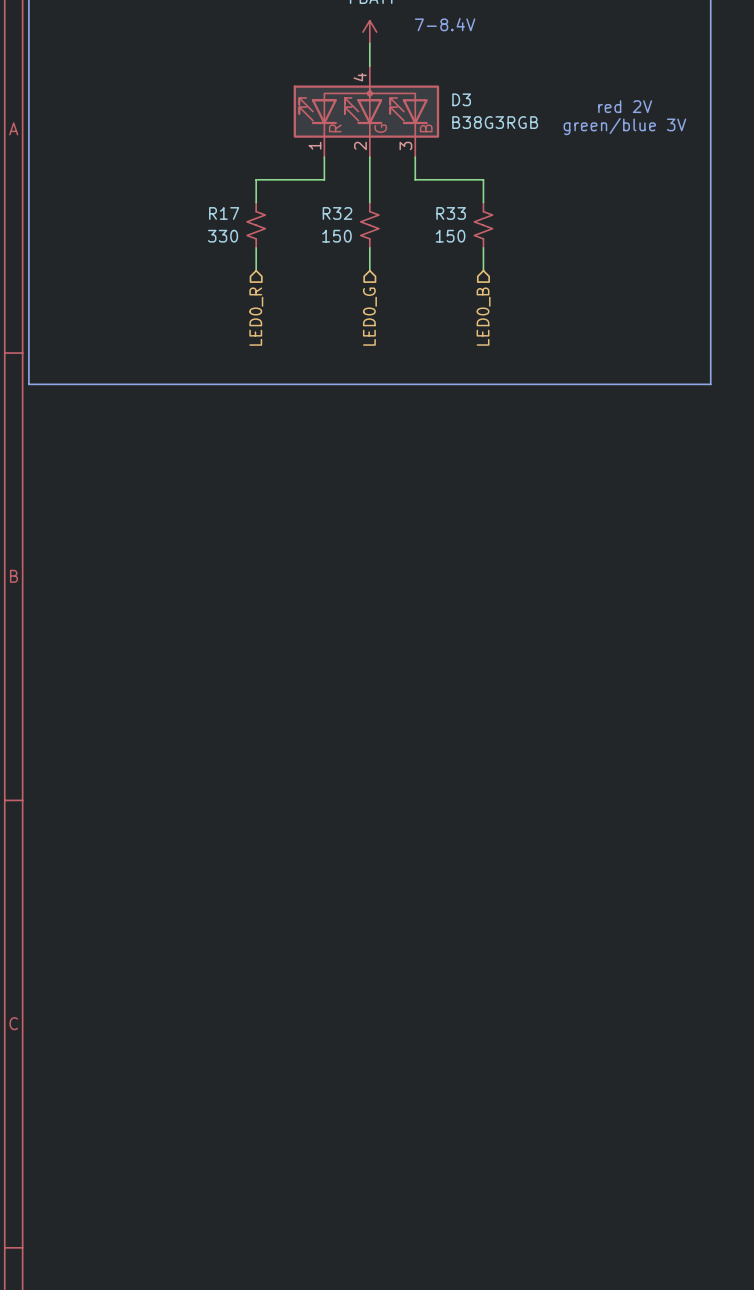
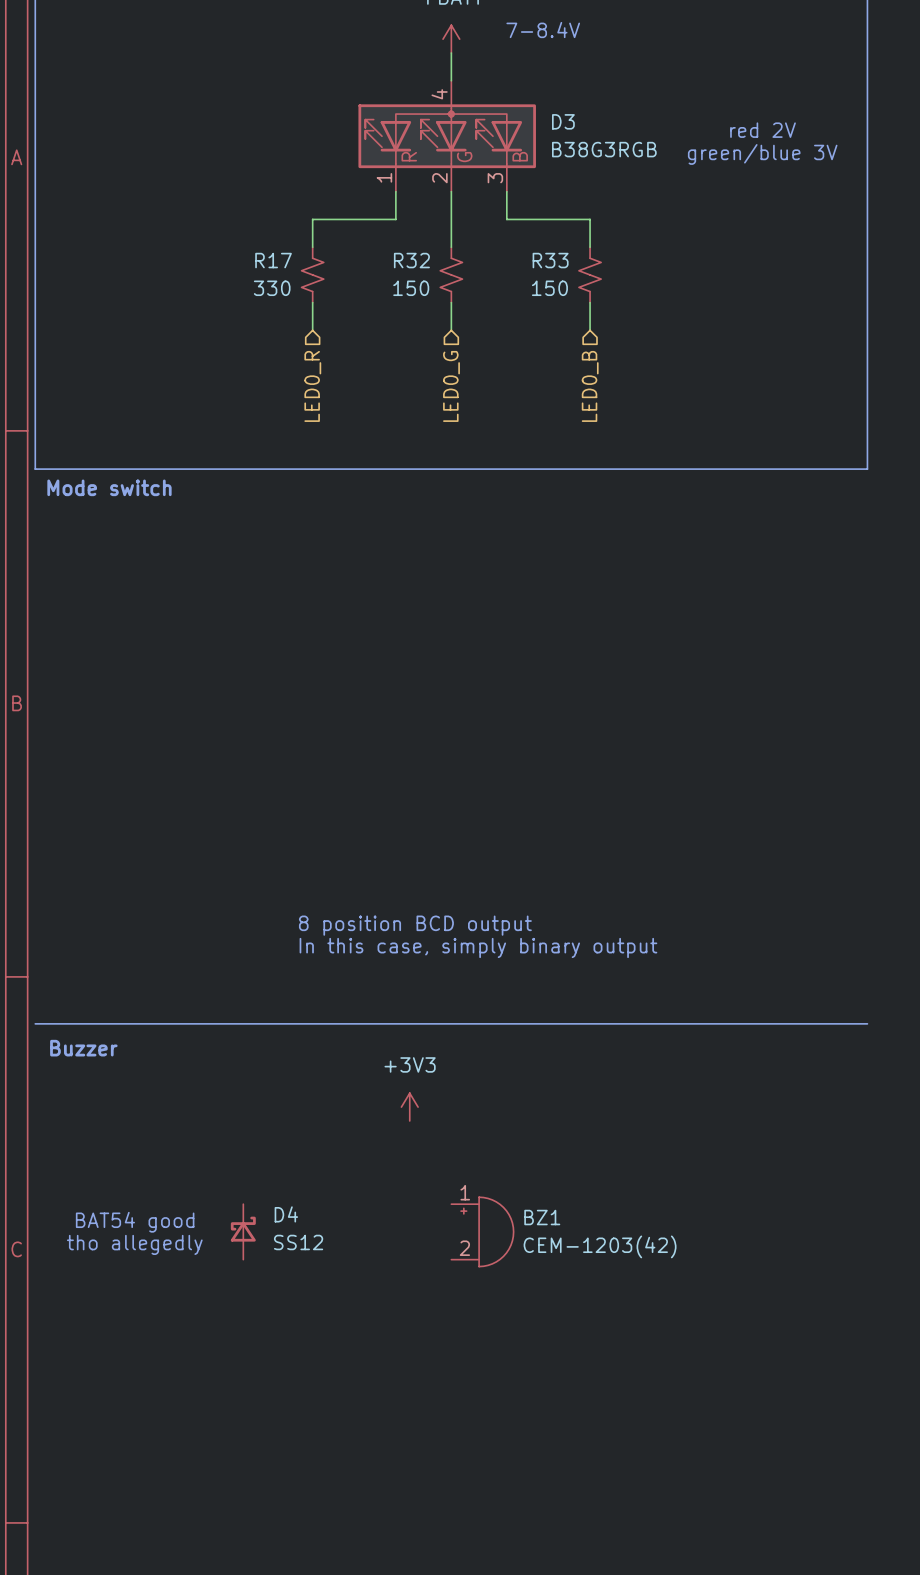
text: none -> Mode switch (109, 487)
text: none -> 8 position BCD output (415, 925)
text: none -> In this case, simply binary output (478, 947)
line: none -> (35, 1023) (867, 1023)
text: none -> Buzzer (83, 1048)
power symbol: none -> +3V3 (409, 1107)
text: none -> BAT54 good (135, 1222)
D4: none -> SS12 (243, 1231)
BZ1: none -> CEM-1203(42) (482, 1231)
text: none -> tho allegedly (134, 1244)

